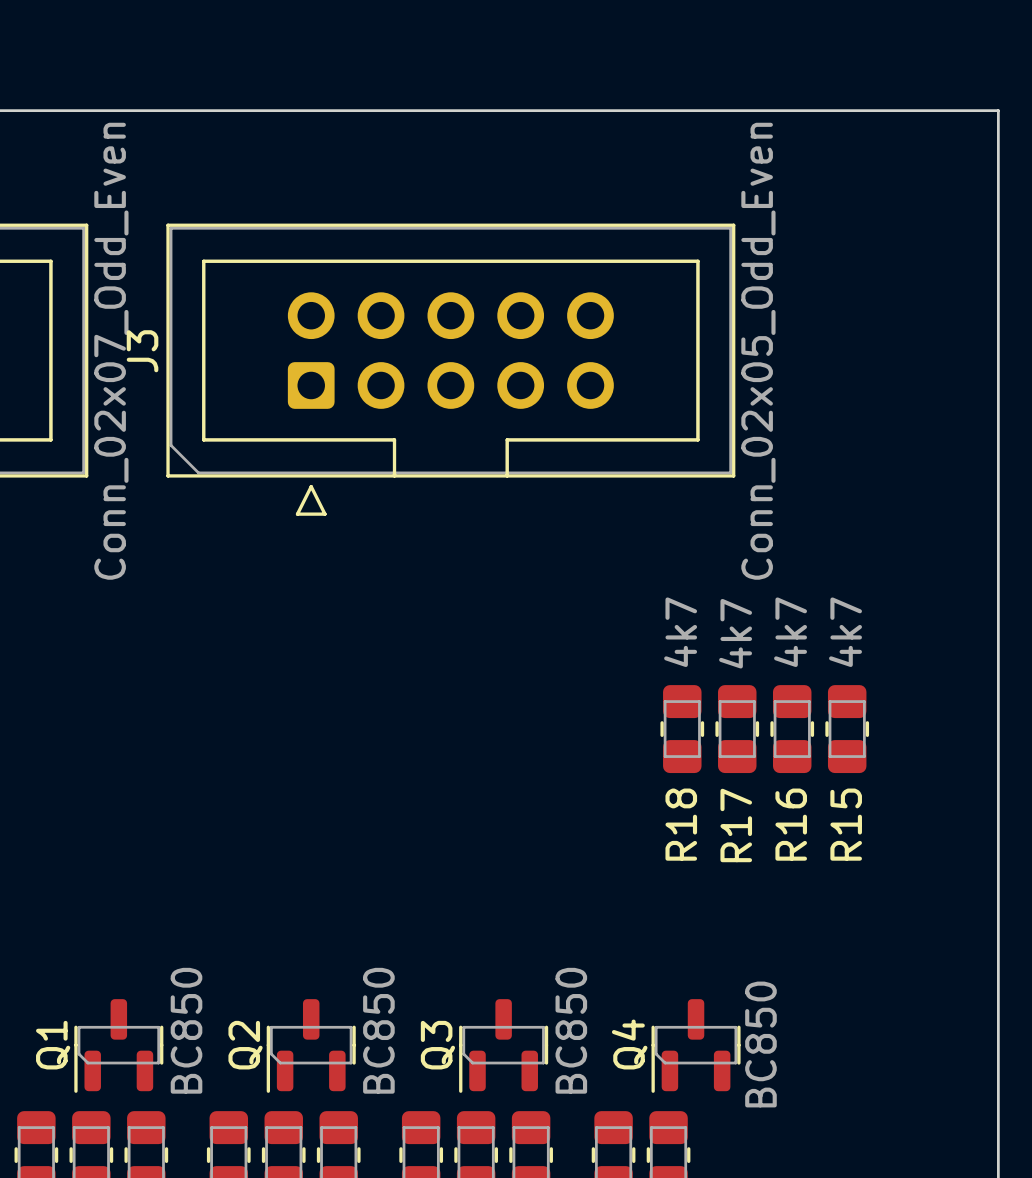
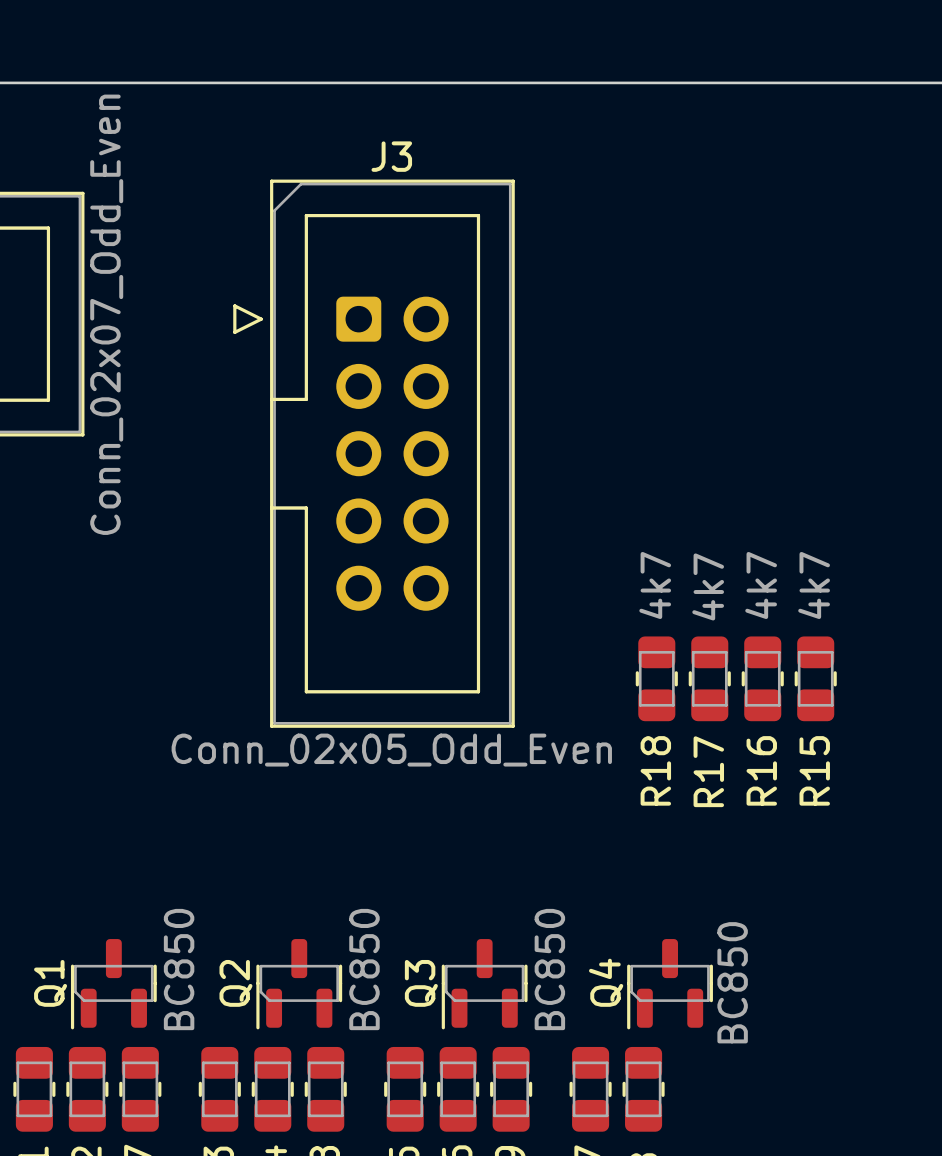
J3 rotation: 0° (450, 369) -> 90° clockwise (374, 453)

